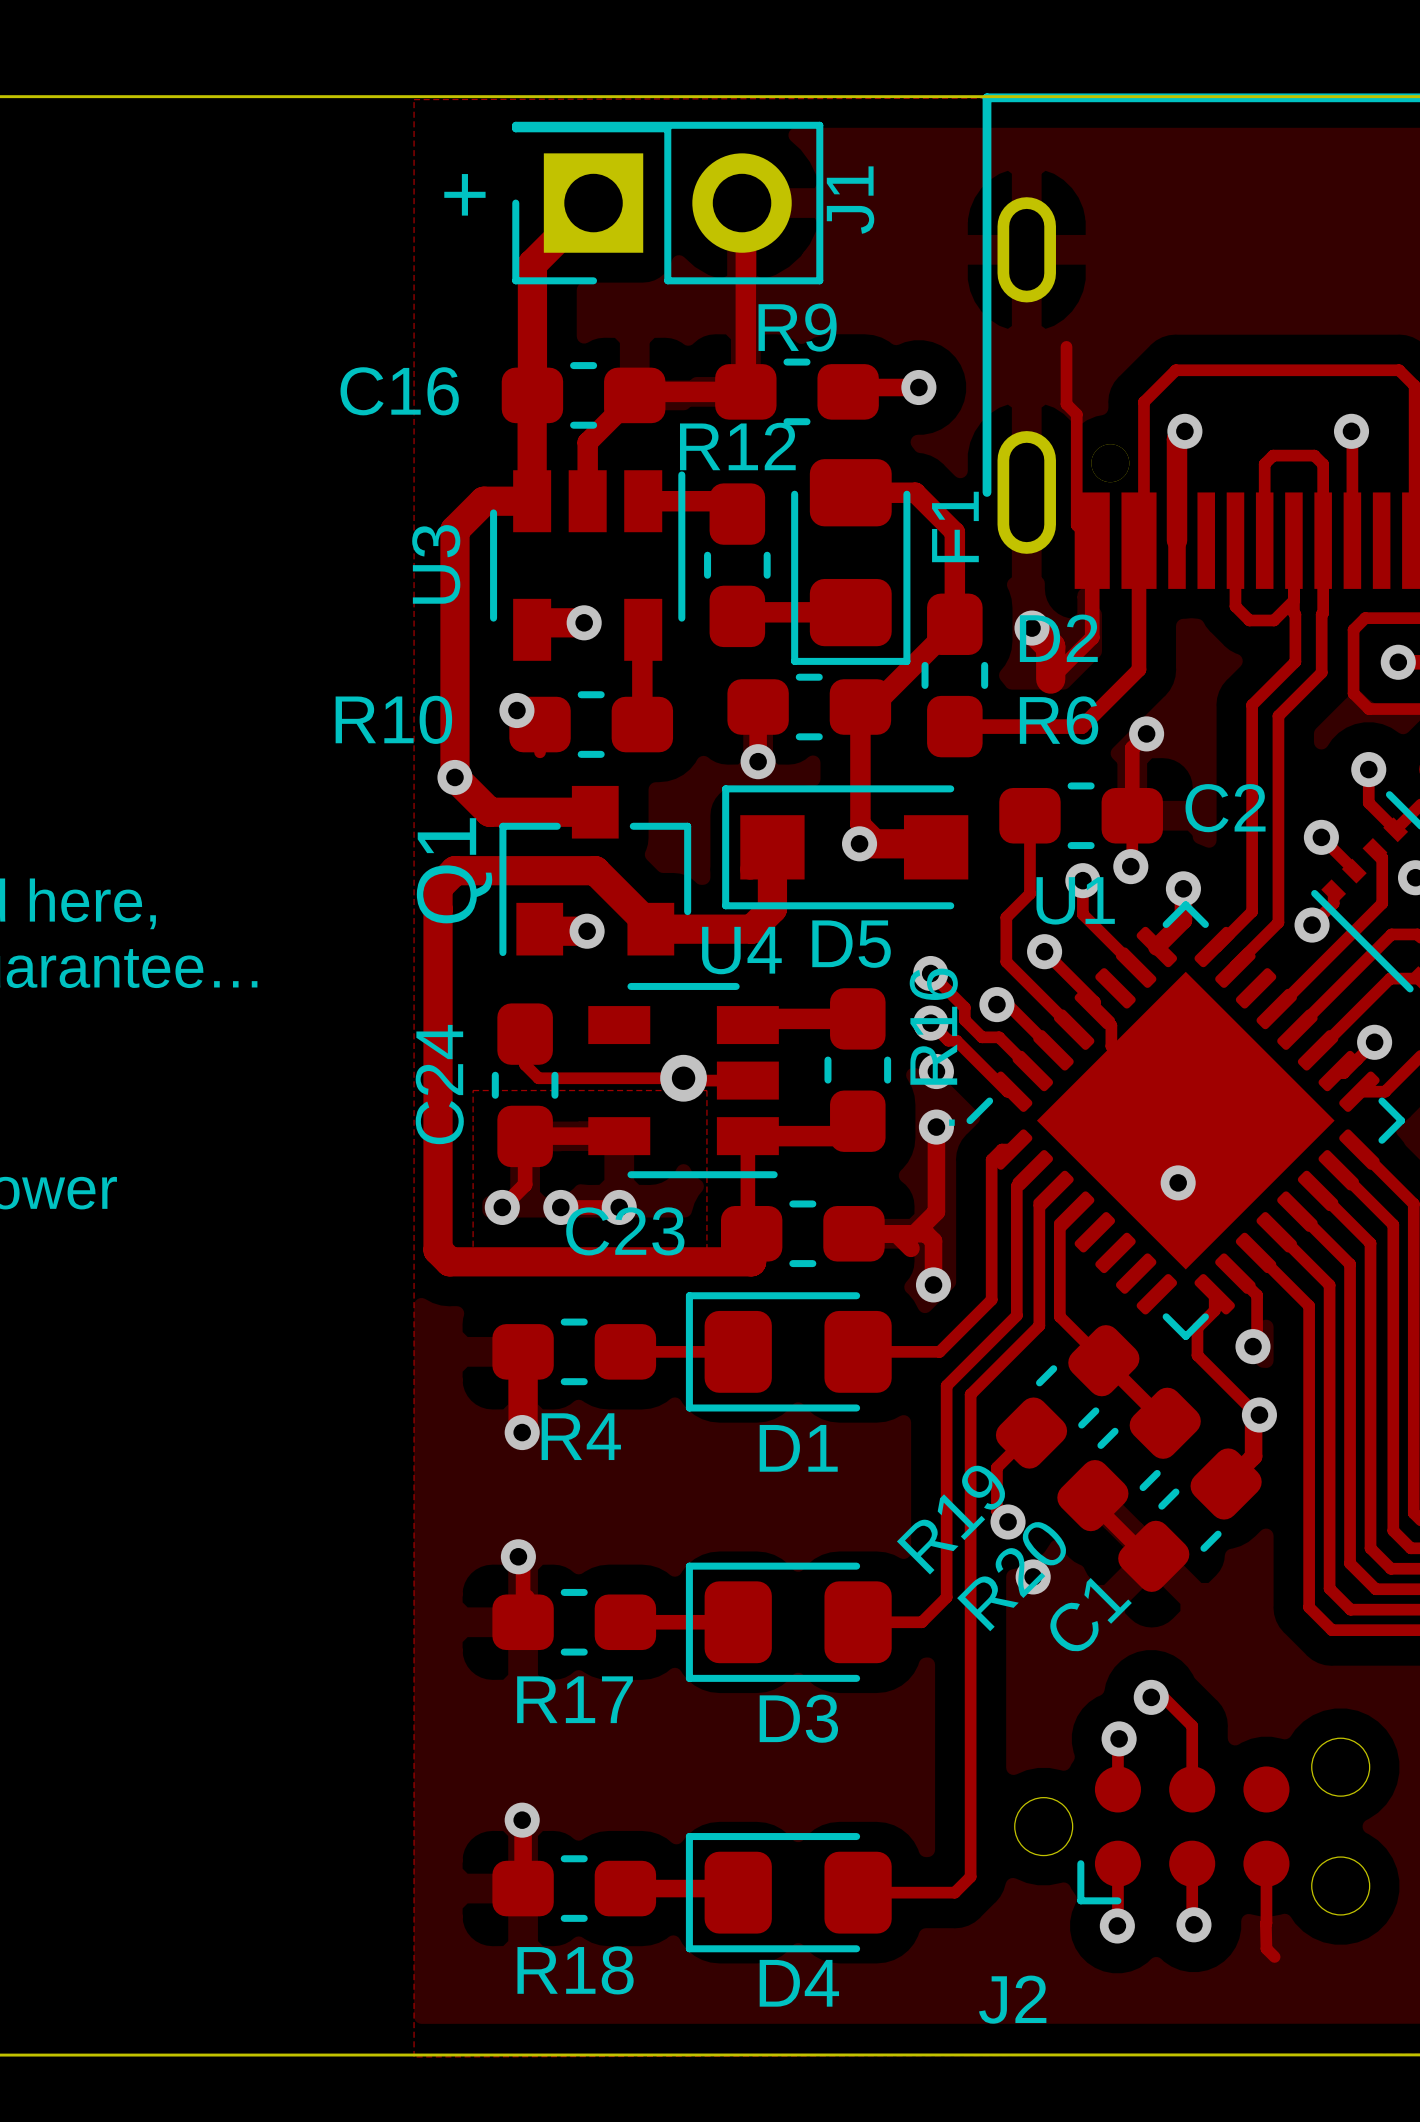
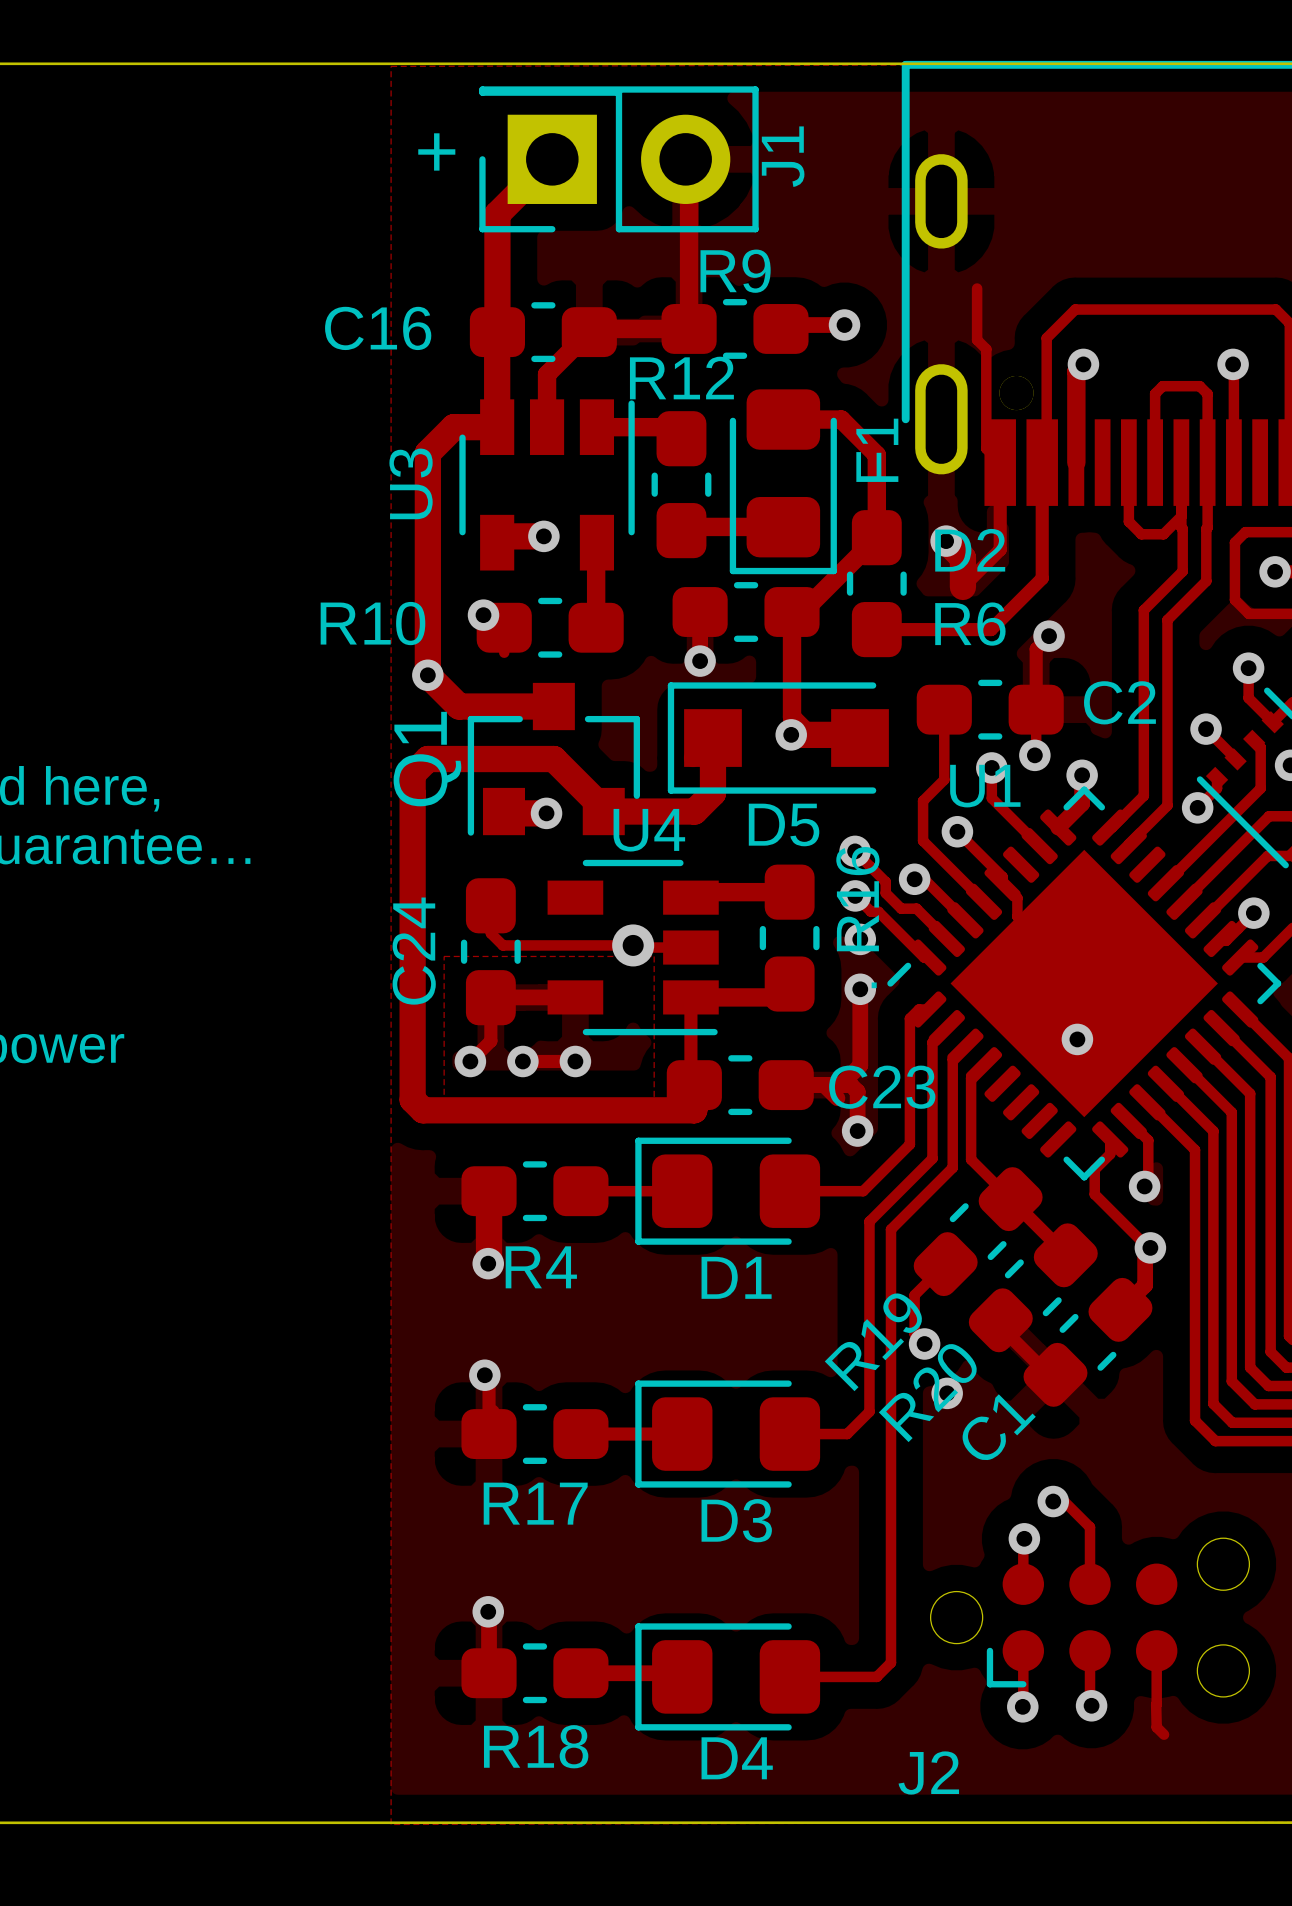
U4 name position: U4 (741, 950) -> U4 (649, 830)
C23 name position: C23 (625, 1231) -> C23 (882, 1087)

